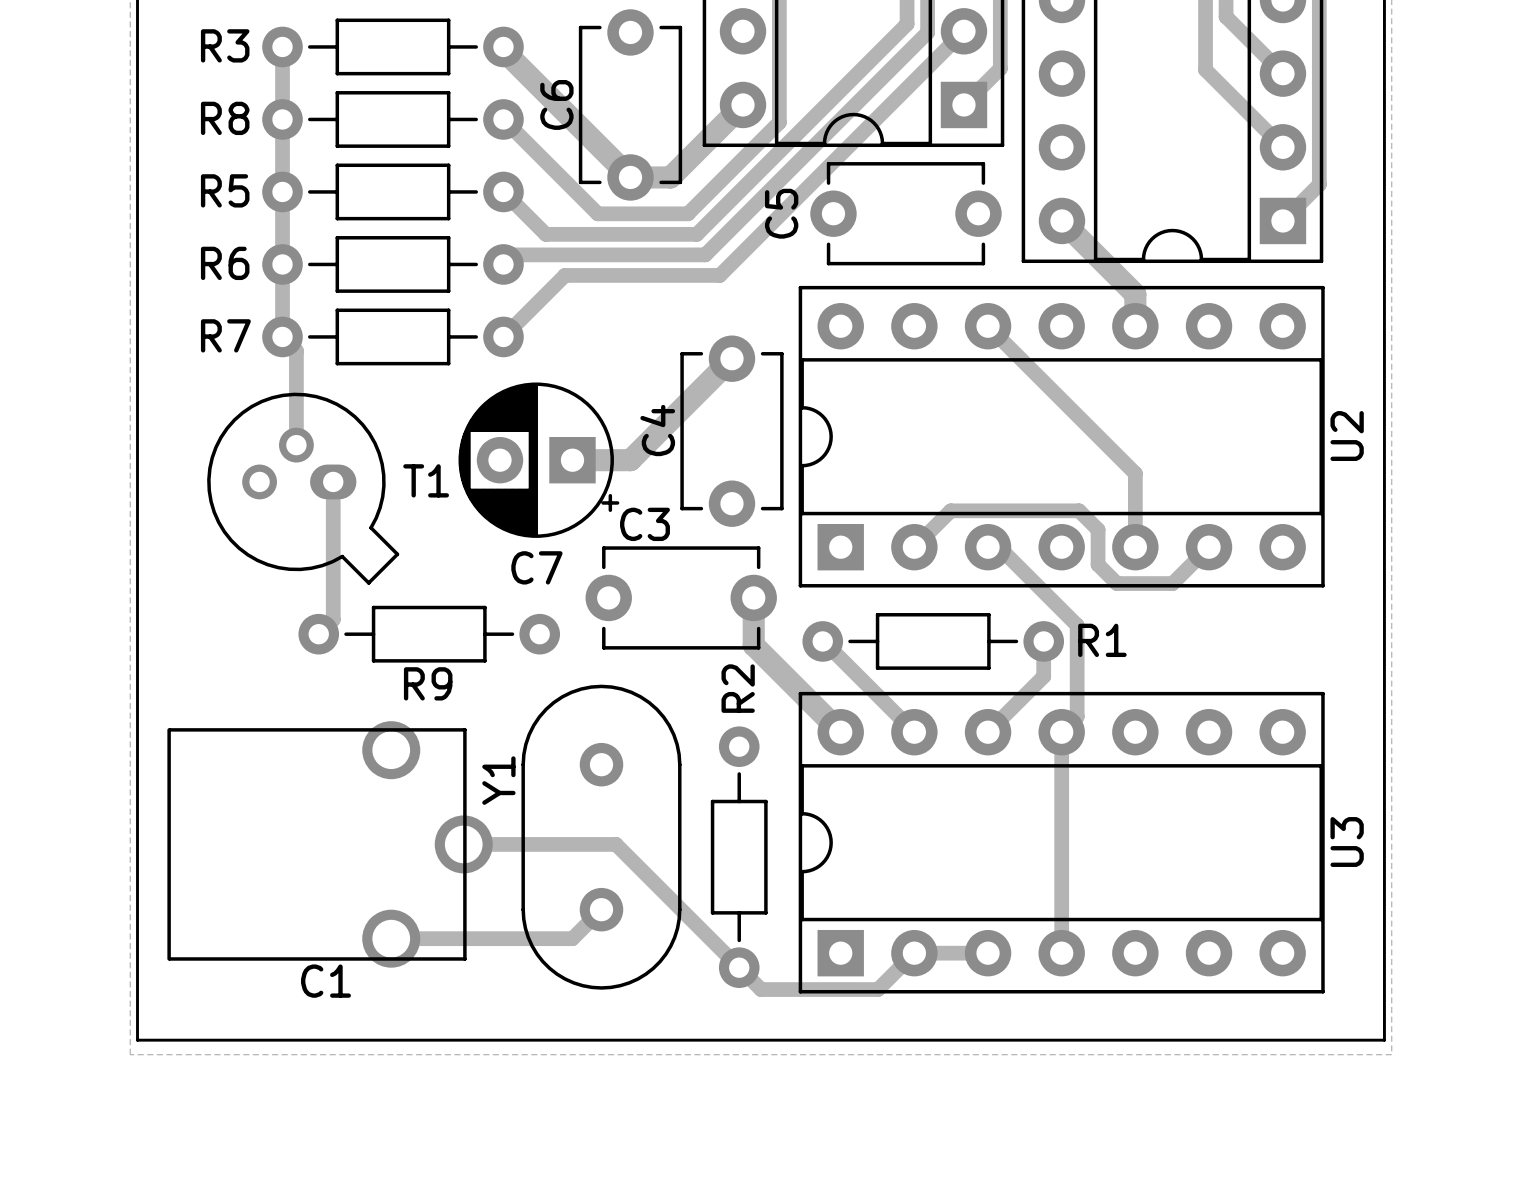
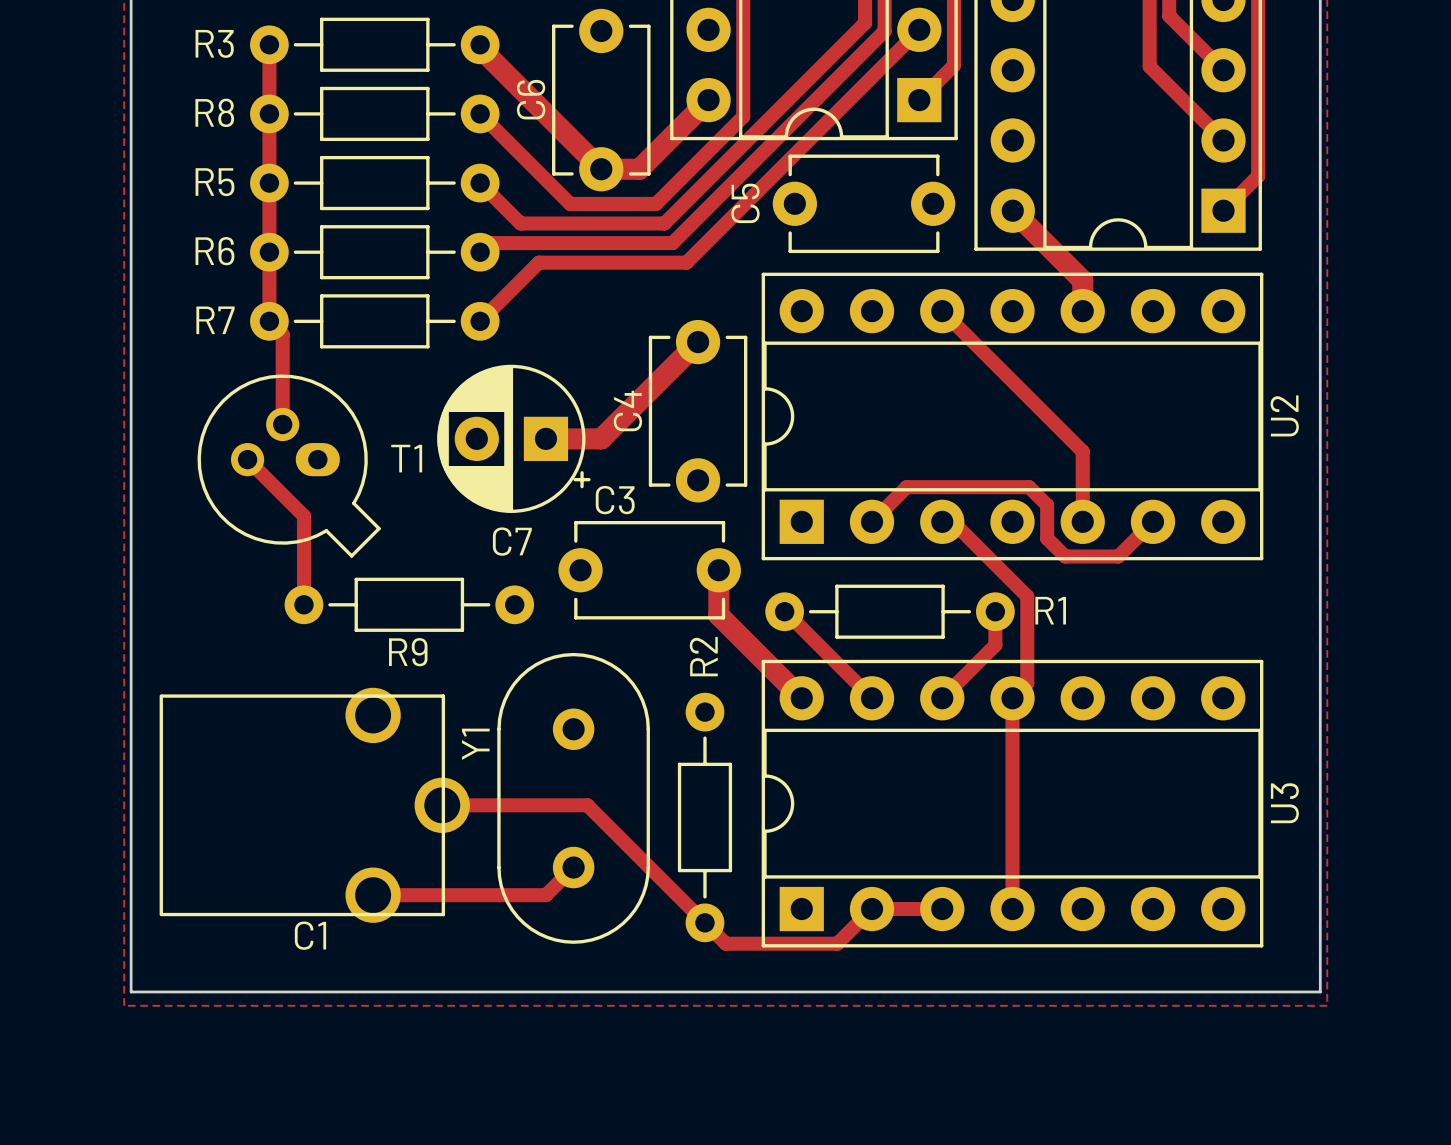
track: (333, 481) (333, 619) (318, 634) -> (247, 459) (303, 516) (303, 604)

